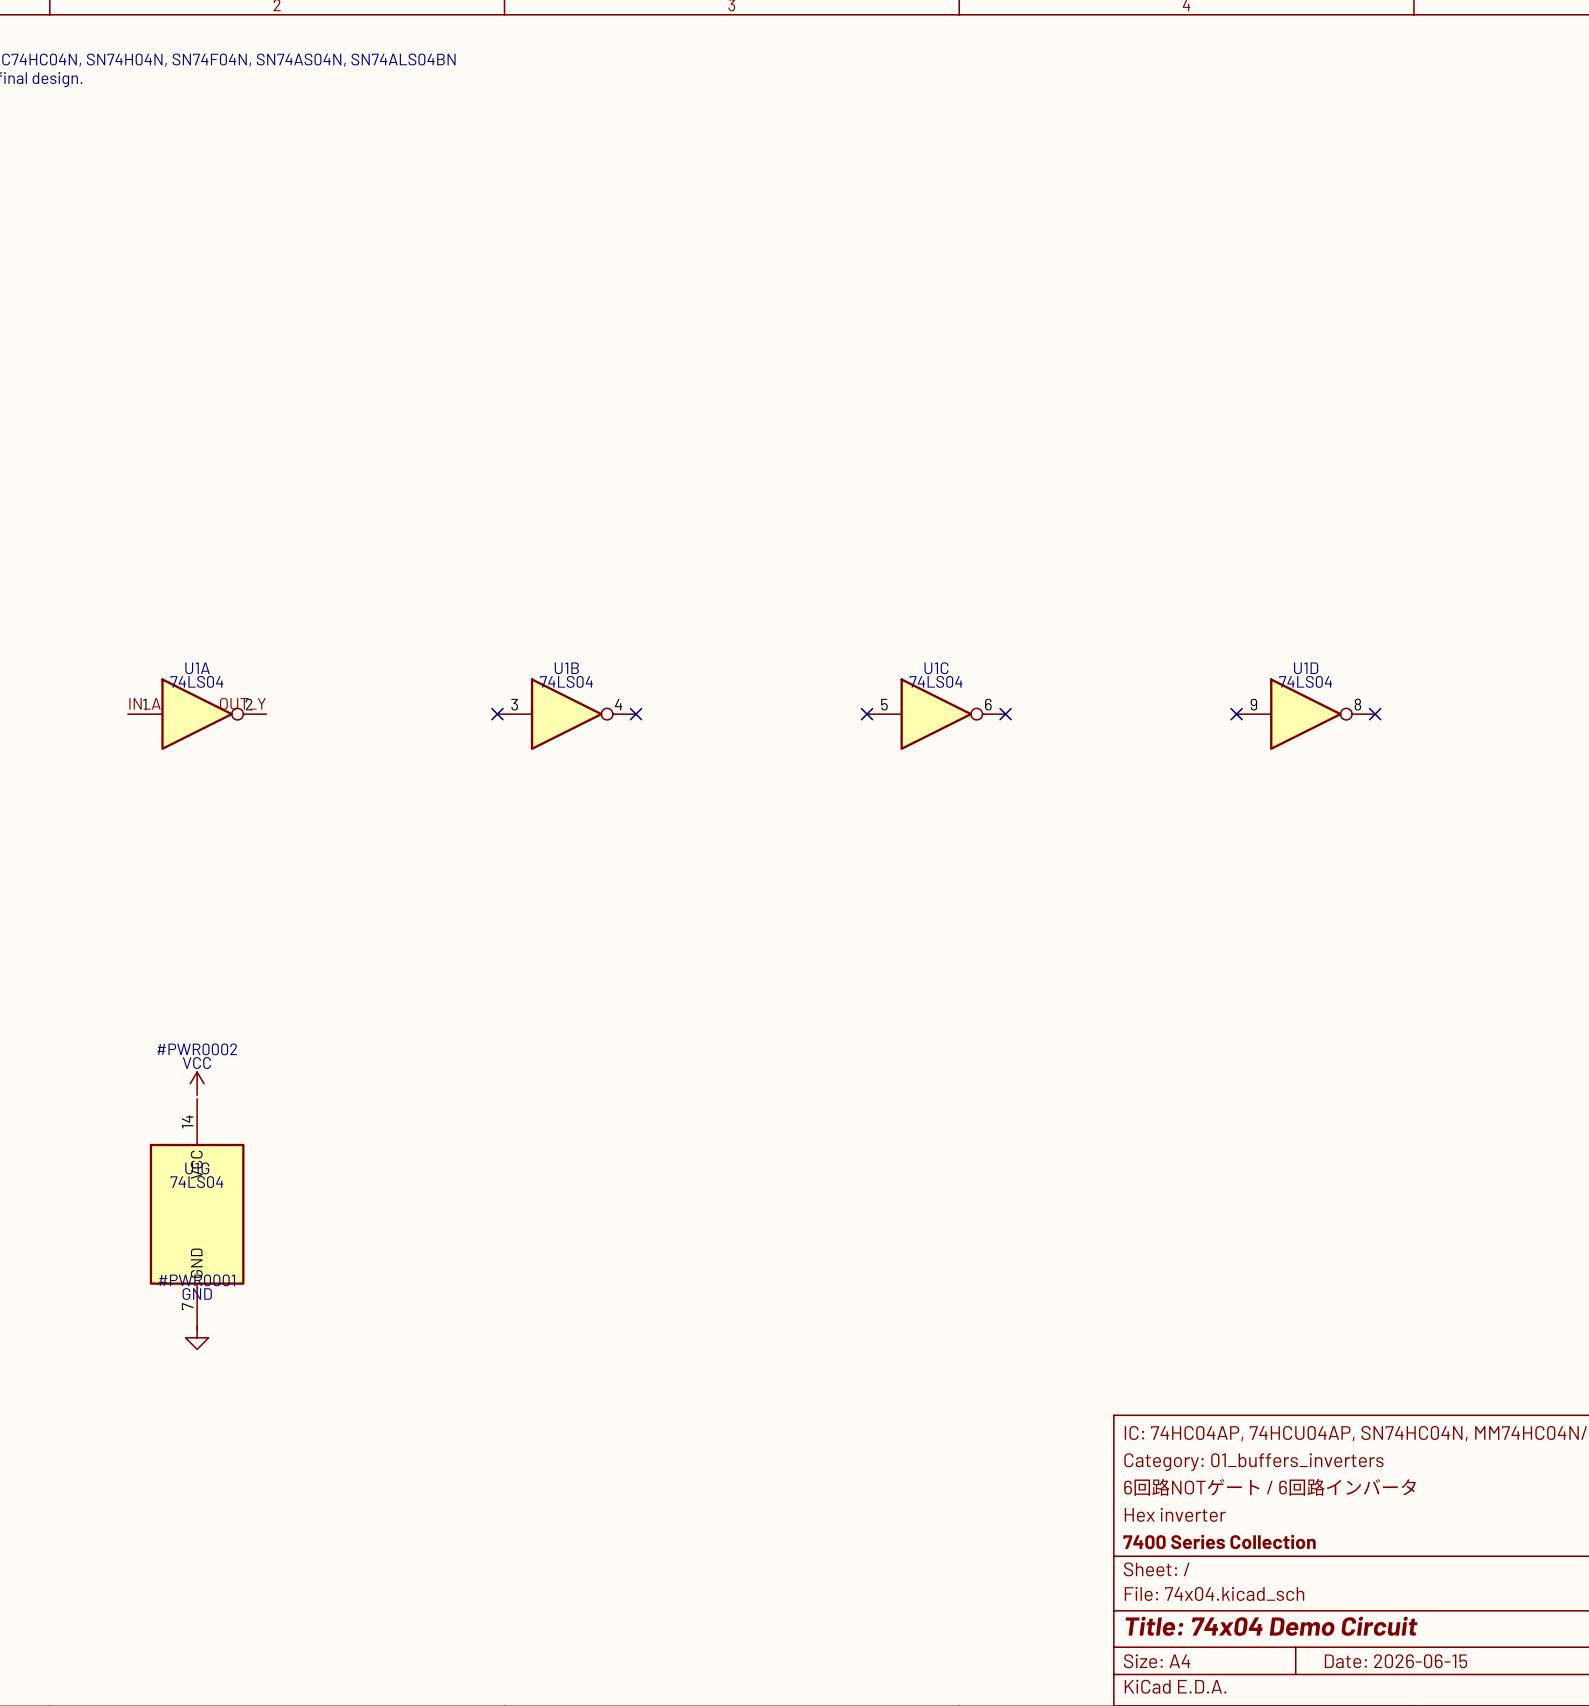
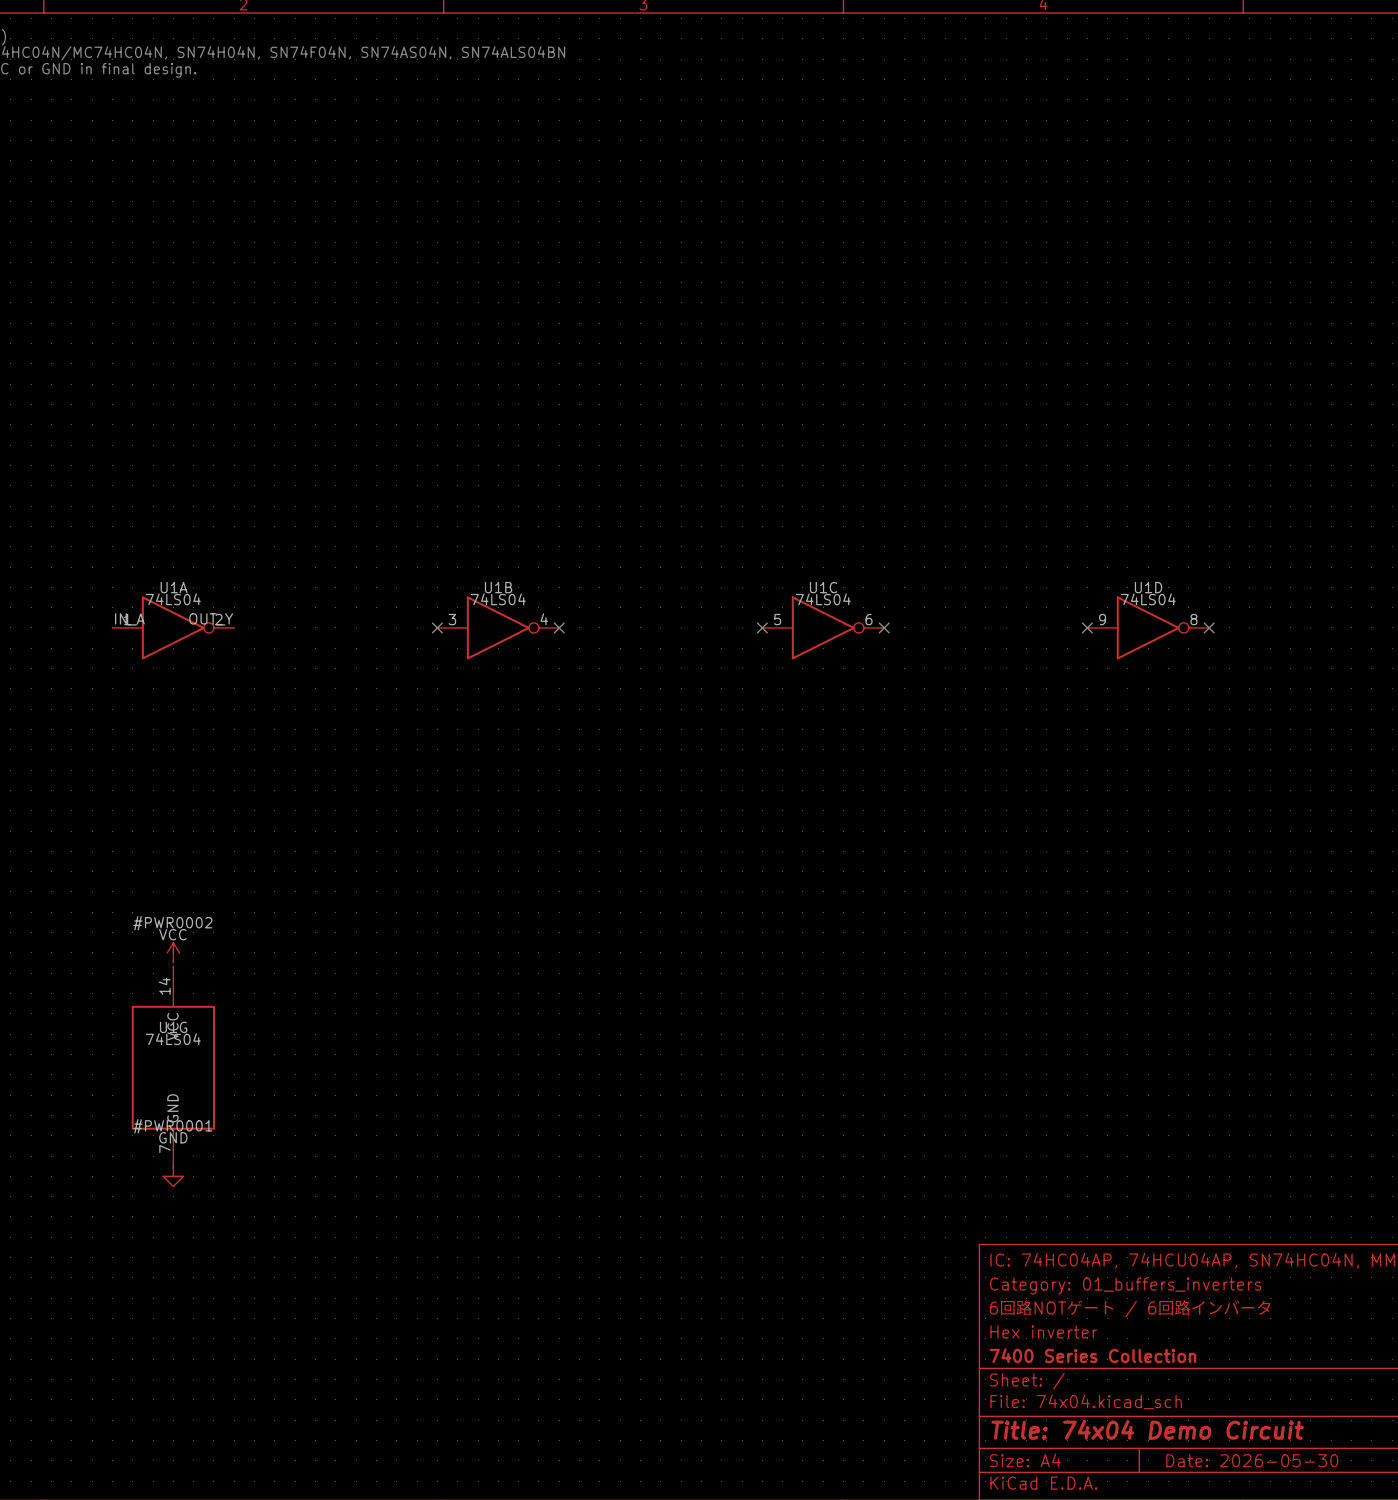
title block: Date: 2026-06-15 (1396, 1661) -> Date: 2026-05-30 (1252, 1460)

